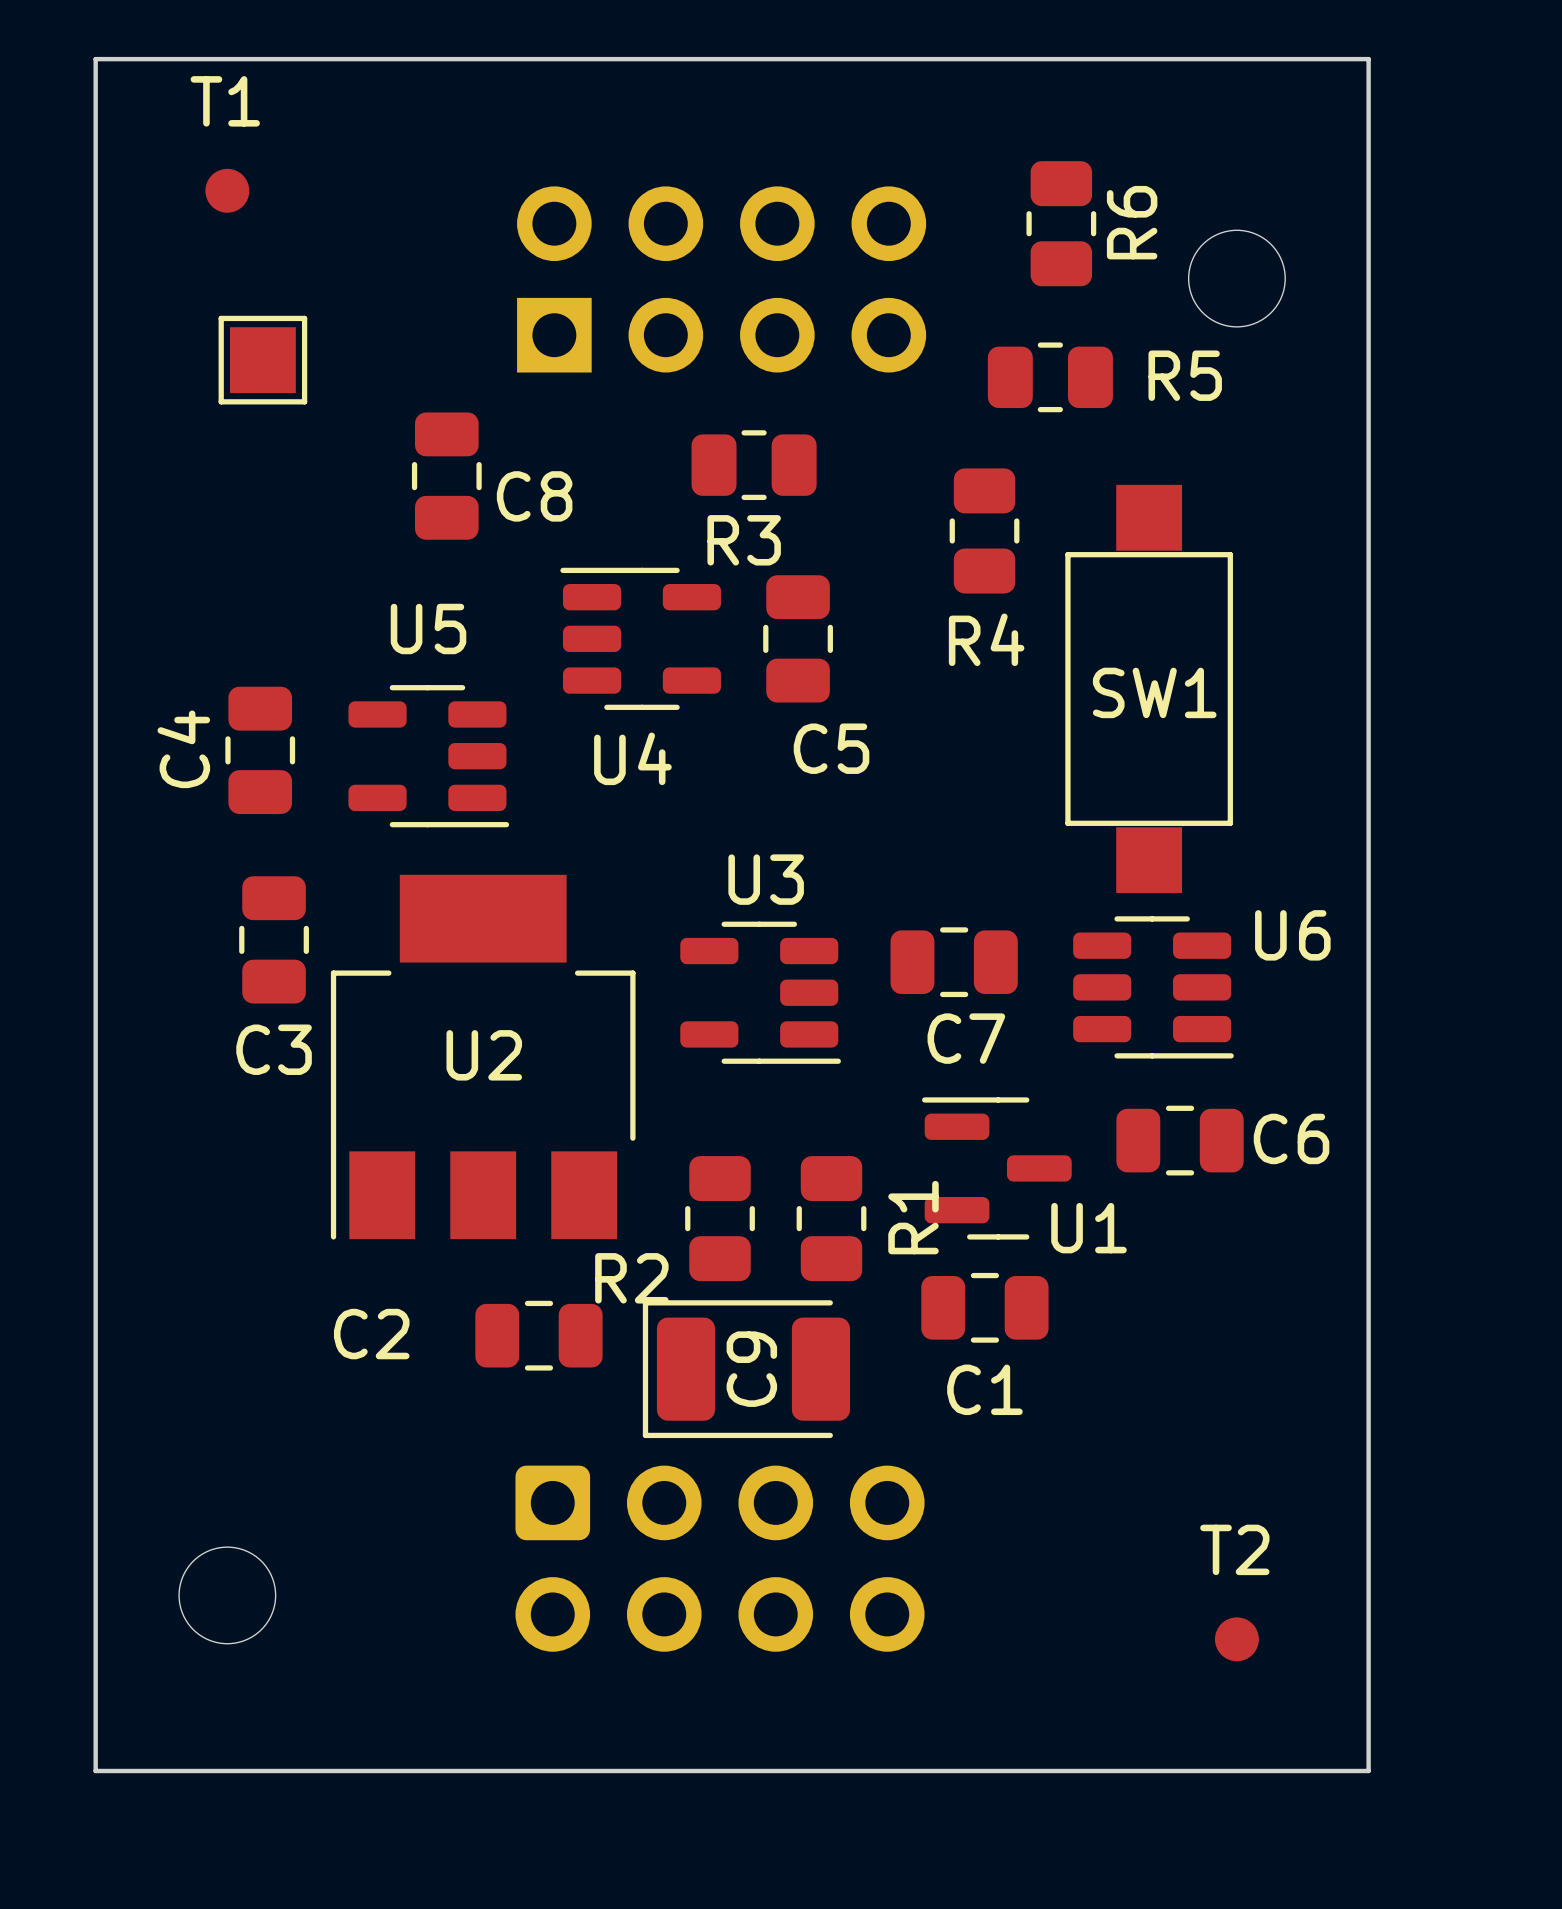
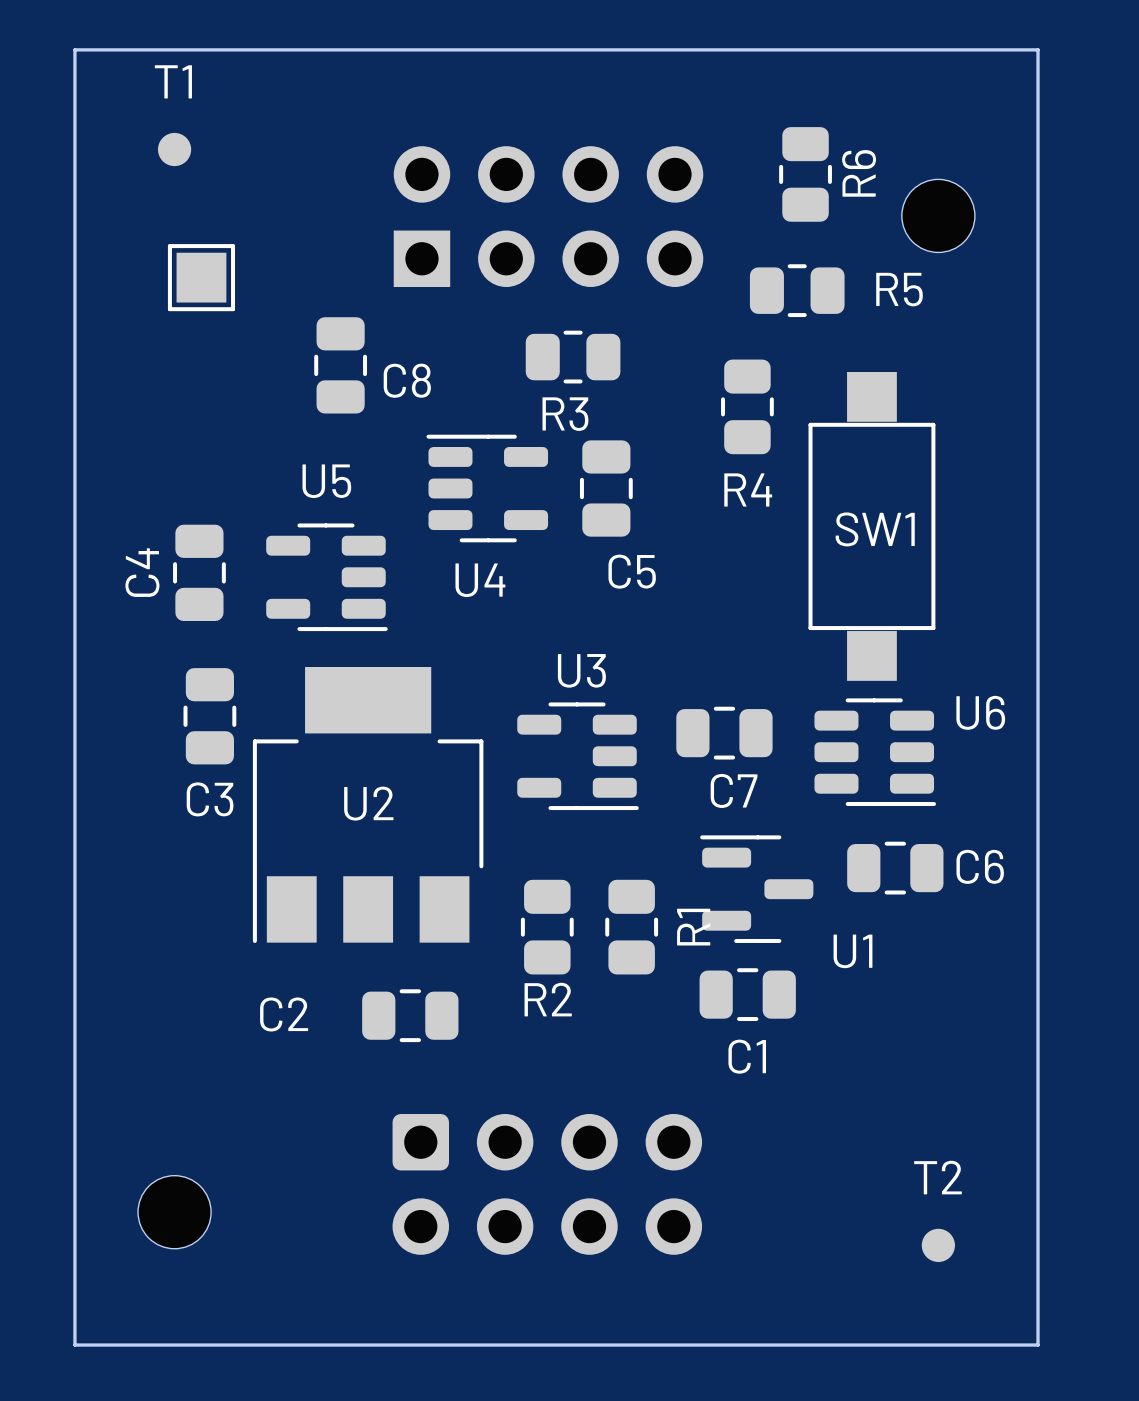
U1 name position: U1 (1088, 1228) -> U1 (852, 951)
R2 name position: R2 (631, 1278) -> R2 (548, 999)
C9: (746, 1369) -> none

